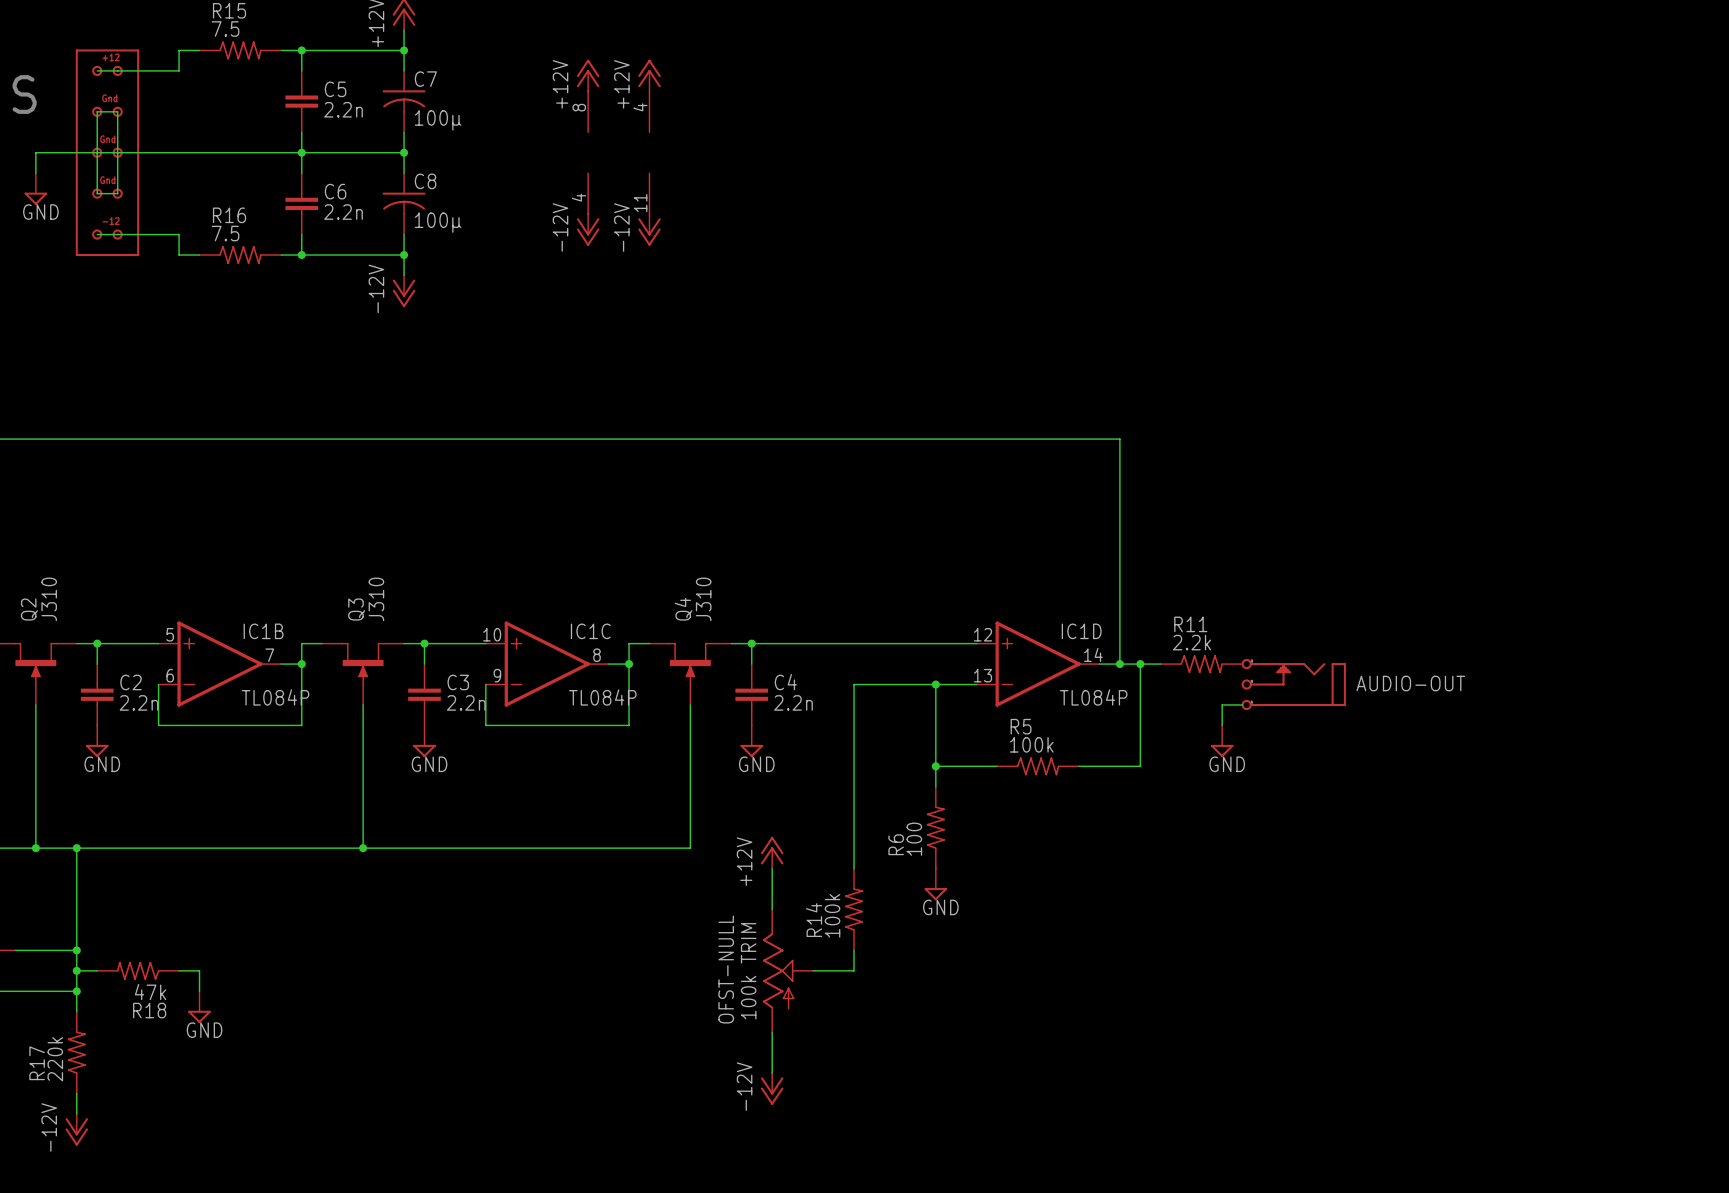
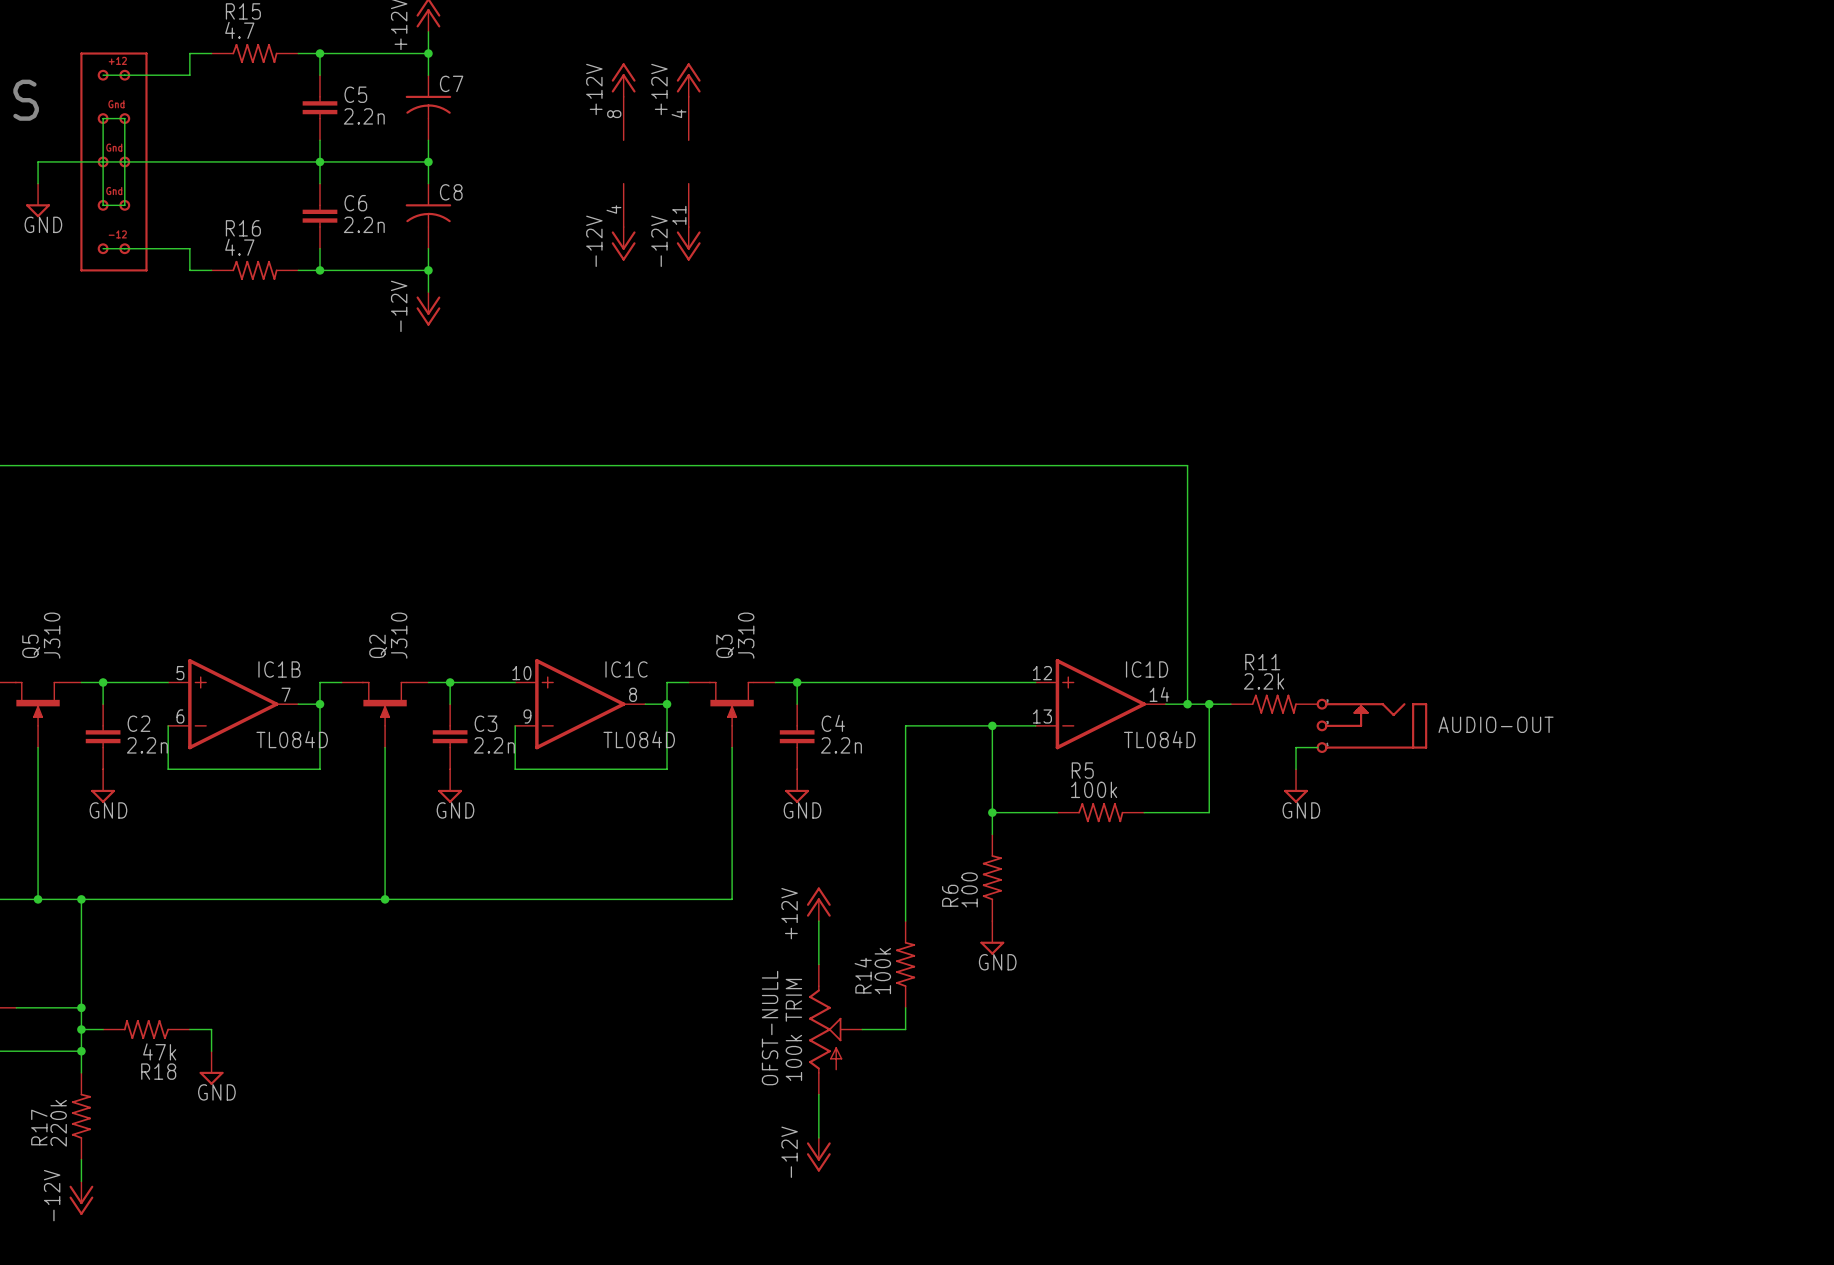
R15 value: 7.5 (225, 28) -> 4.7 (239, 30)
C7 value: 100µ (438, 120) -> none
C8 value: 100µ (438, 222) -> none
R16 value: 7.5 (225, 233) -> 4.7 (239, 247)
Q2 name: Q2 (29, 609) -> Q5 (31, 646)
Q3 name: Q3 (356, 609) -> Q2 (378, 646)
Q4 name: Q4 (683, 609) -> Q3 (725, 646)
IC1B value: TL084P (275, 697) -> TL084D (292, 739)
IC1C value: TL084P (602, 697) -> TL084D (639, 739)
IC1D value: TL084P (1093, 697) -> TL084D (1159, 739)

